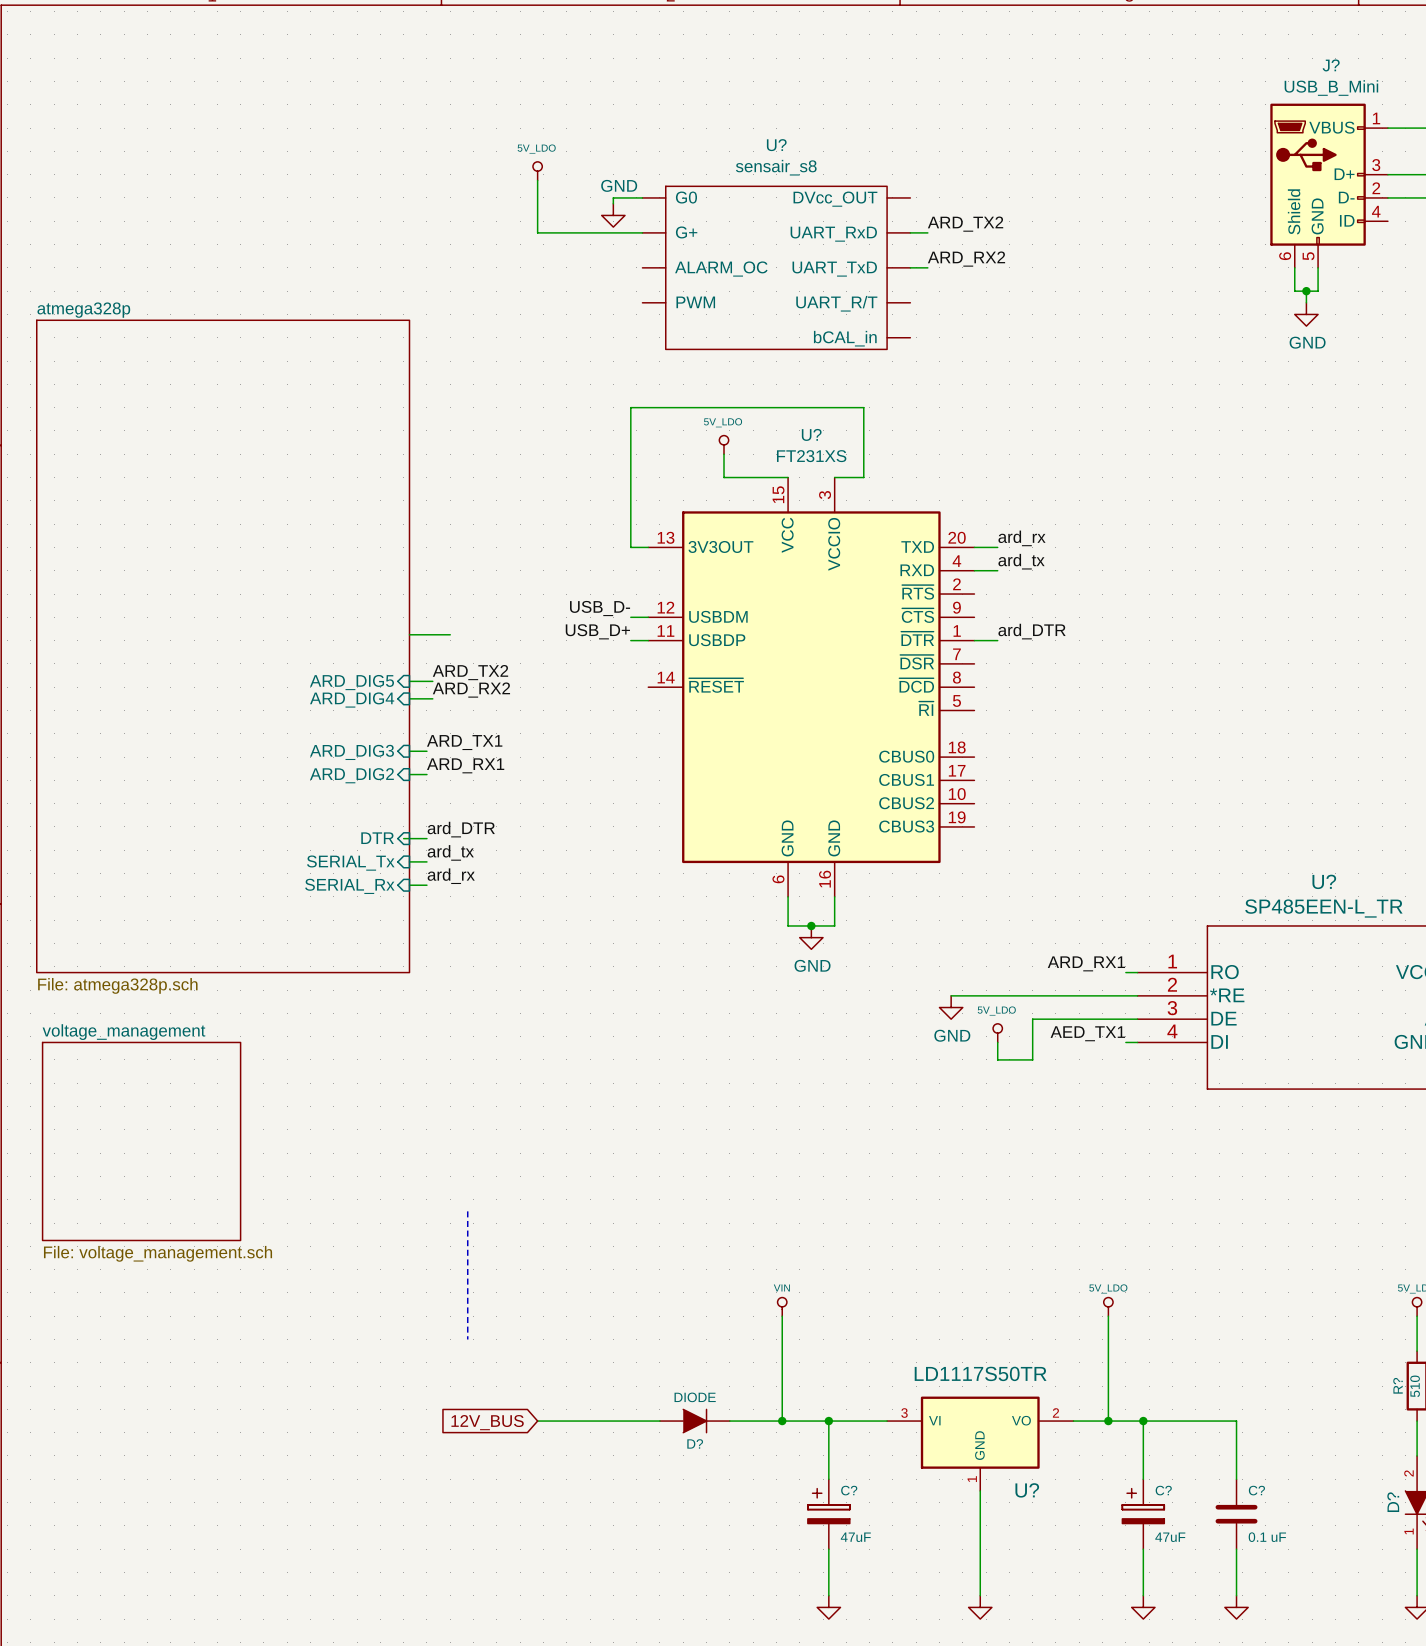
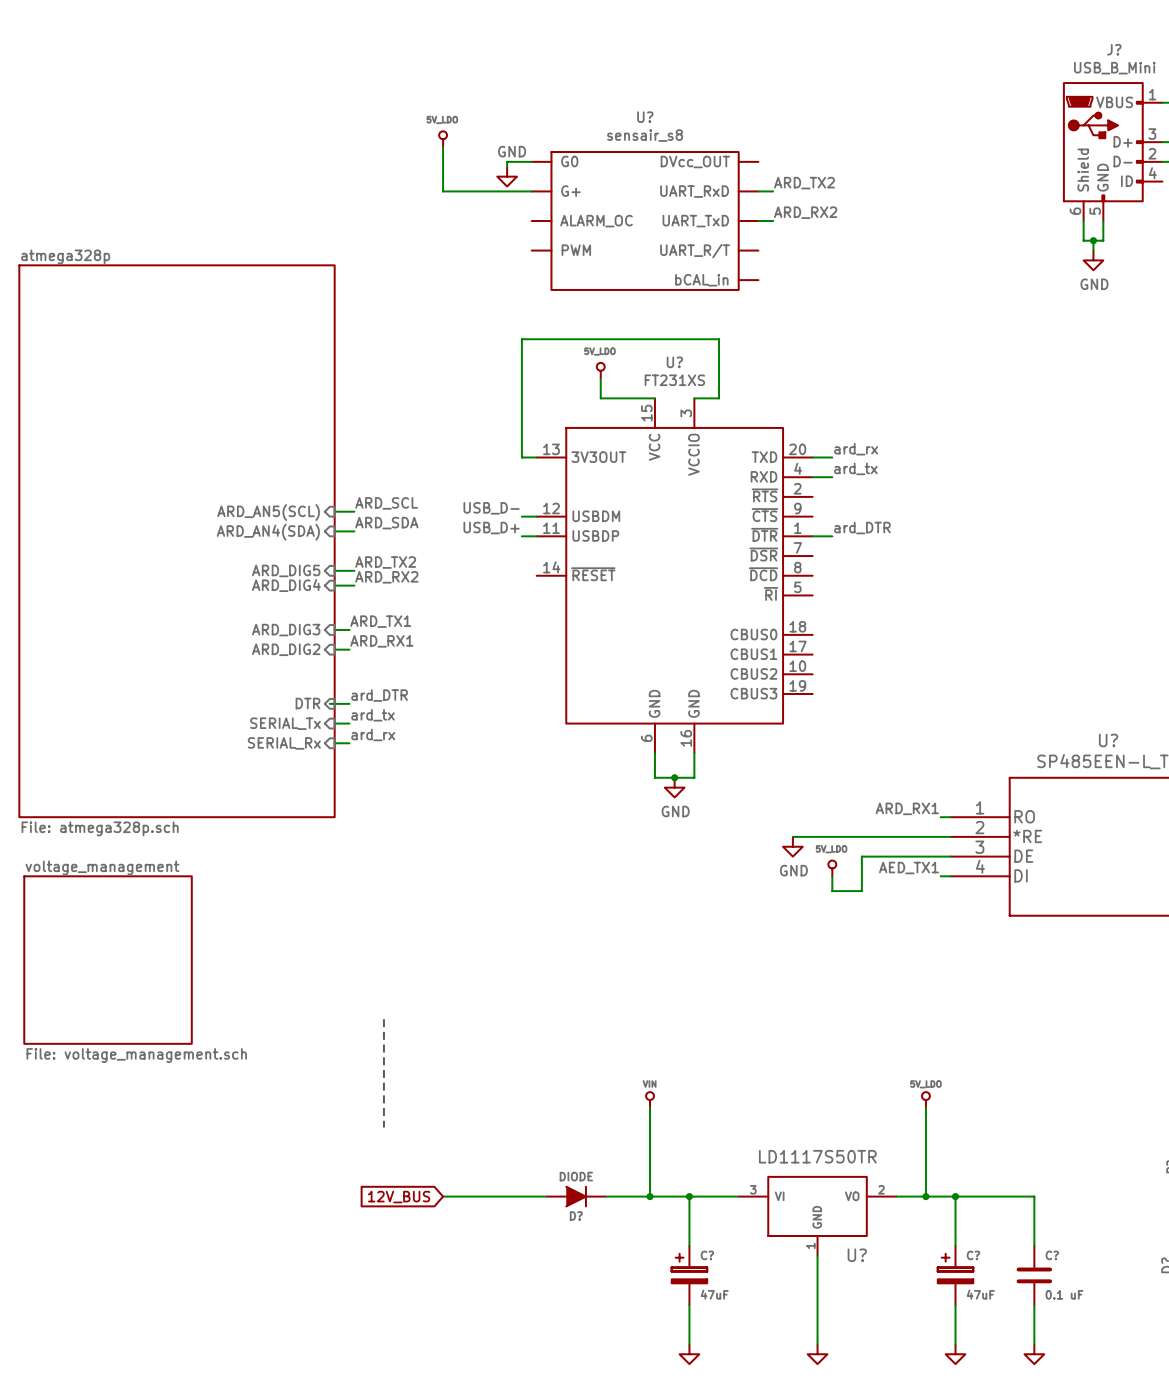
label: none -> ARD_SCL (386, 503)
wire: none -> (334, 511) (354, 511)
sheet pin: none -> ARD_AN5(SCL) (268, 512)
label: none -> ARD_SDA (386, 523)
wire: (432, 634) (450, 634) -> none
sheet pin: none -> ARD_AN4(SDA) (268, 532)

